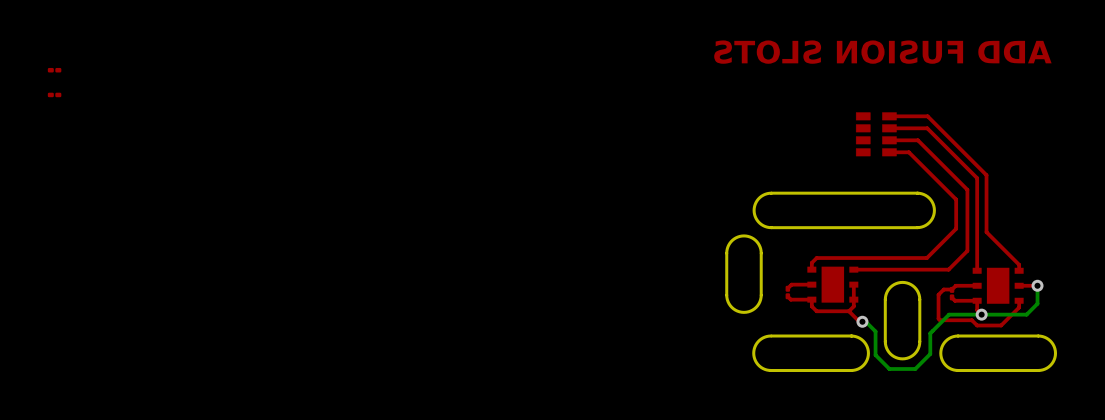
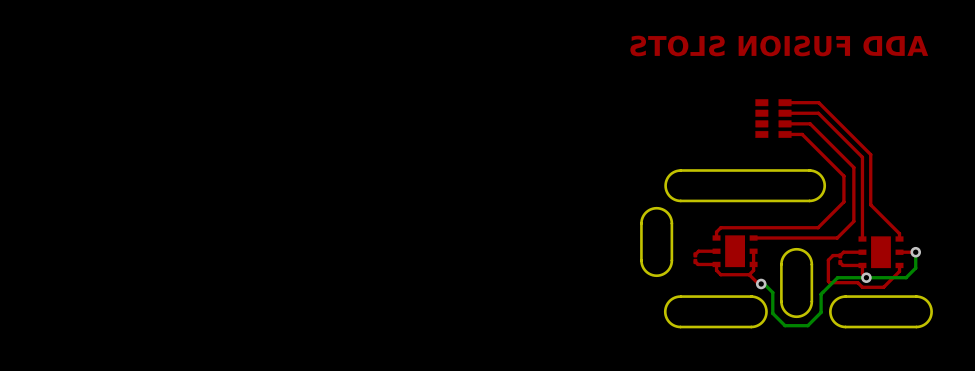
part: (54, 70) -> none
part: (54, 94) -> none

